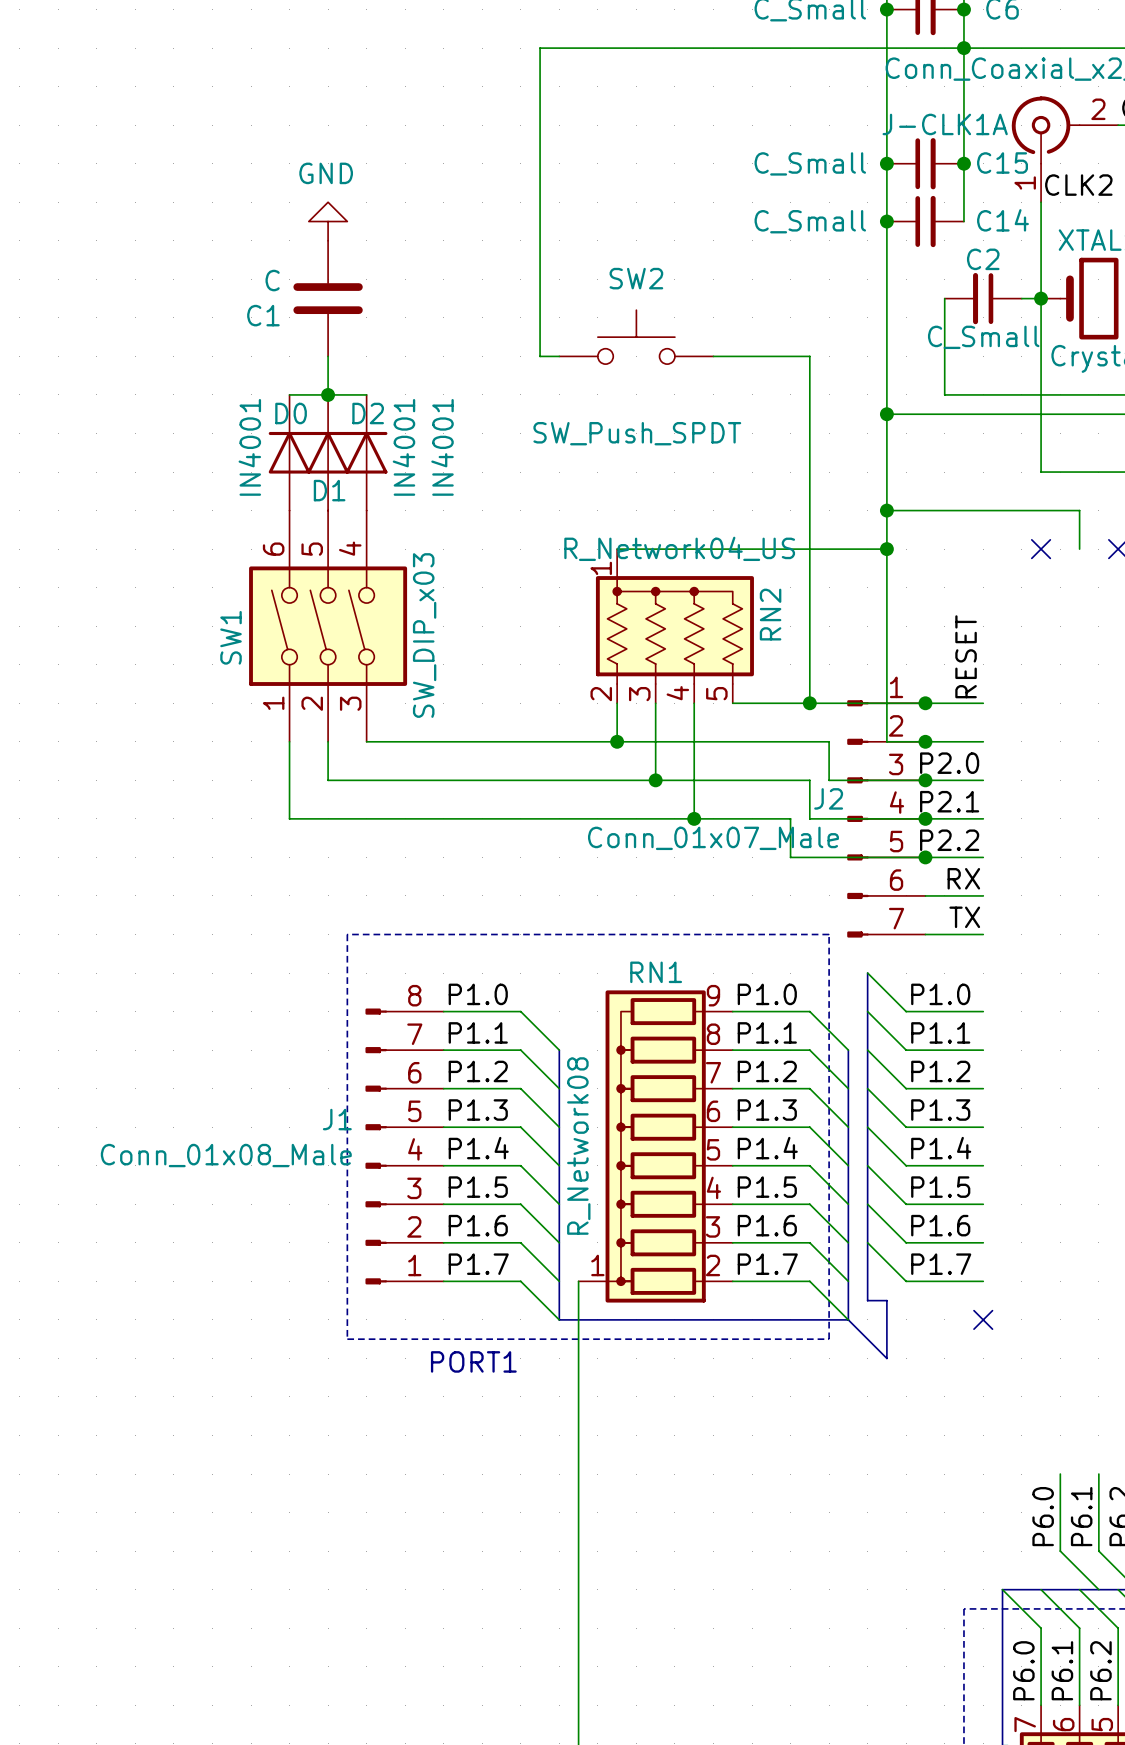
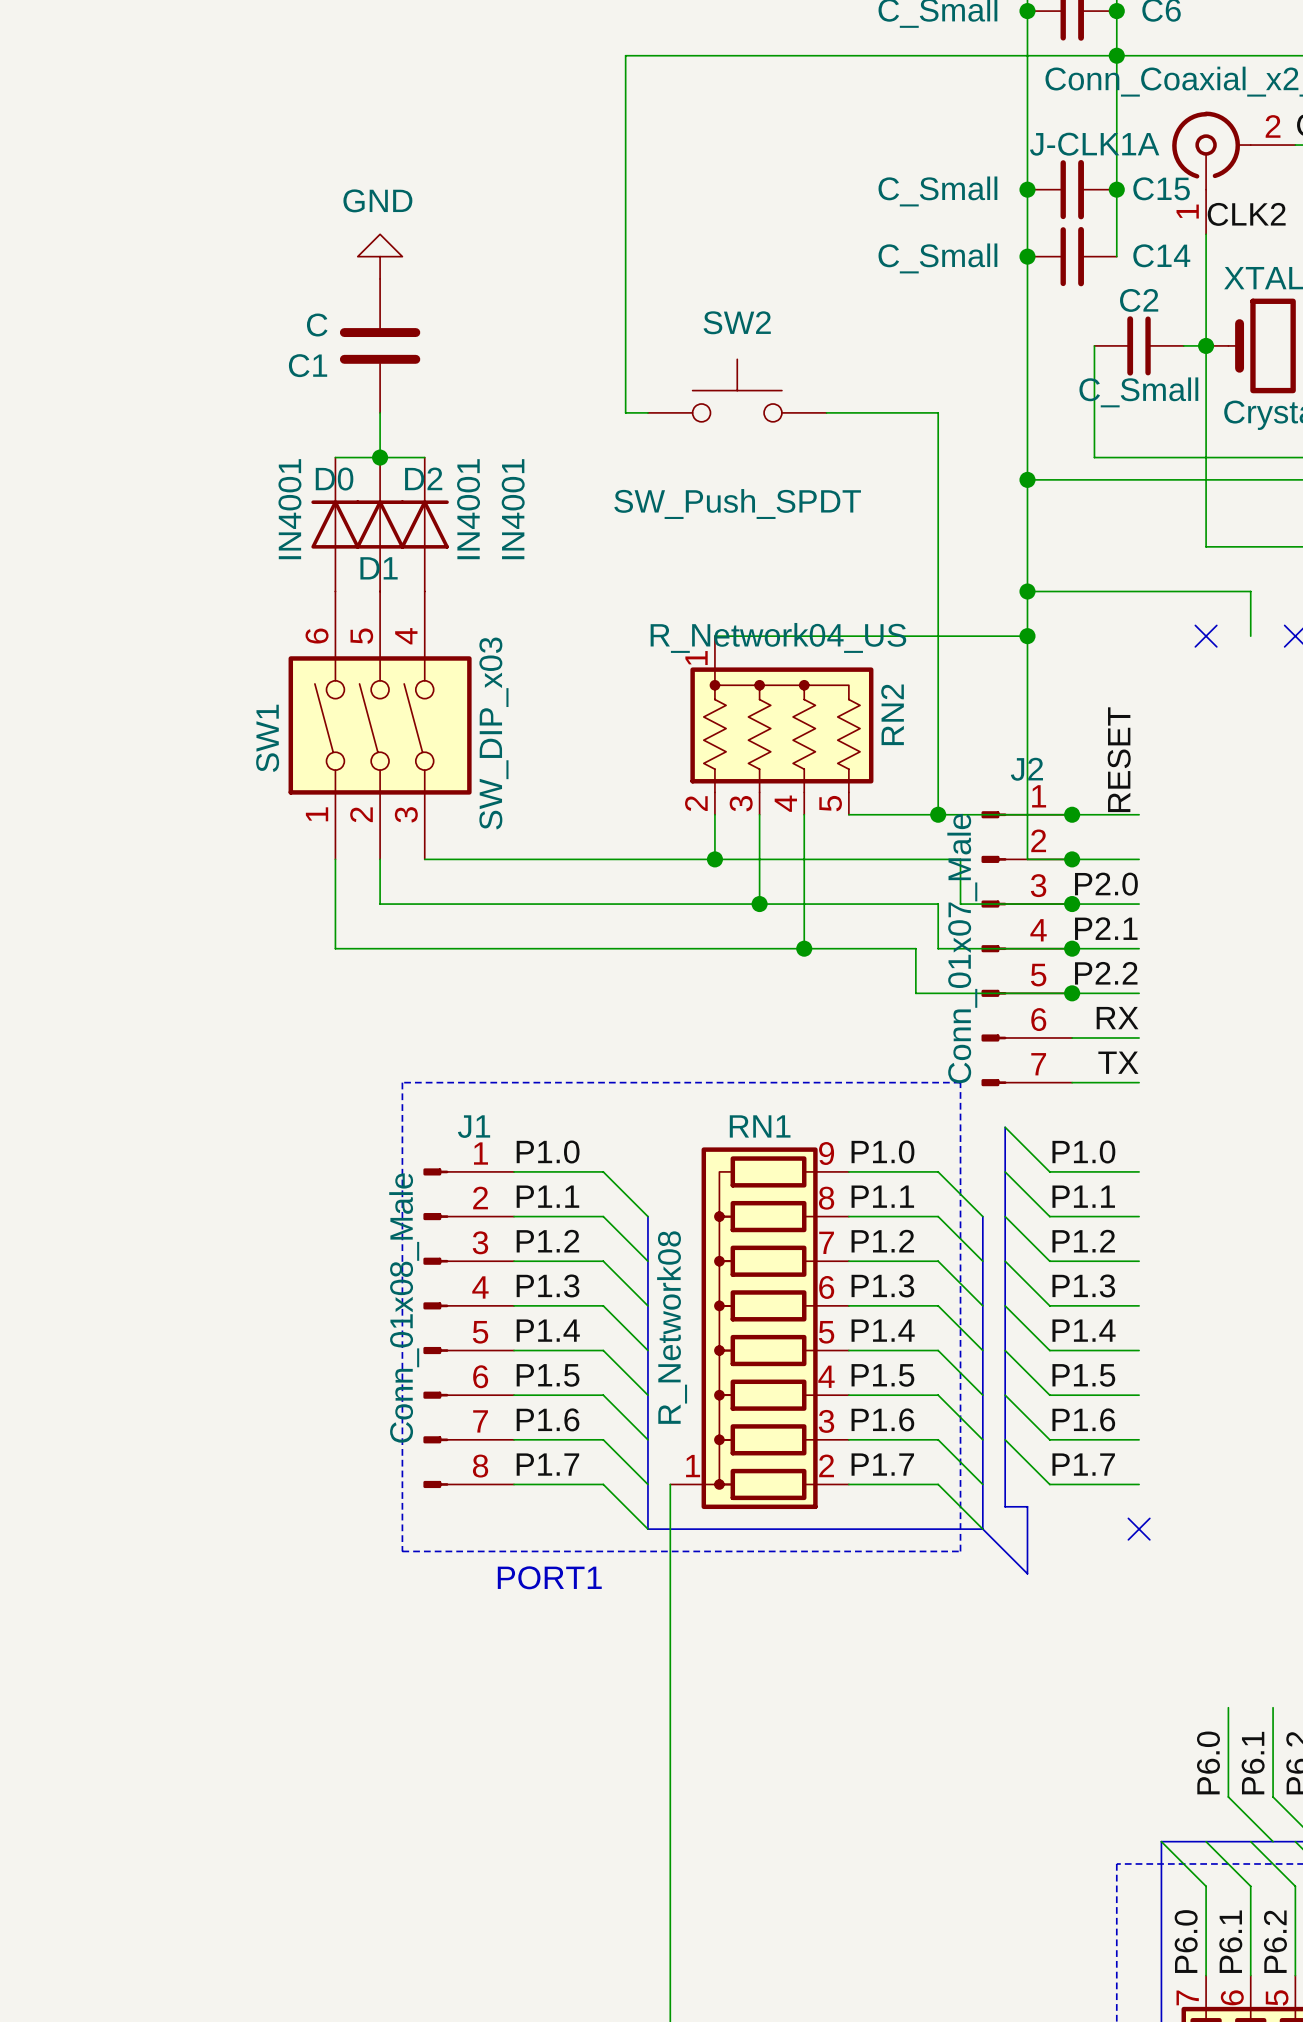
J2 name position: J2 (828, 798) -> J2 (1026, 769)
J2 value rotation: 0° (713, 838) -> 90° counterclockwise (962, 948)
J1 name position: J1 (337, 1119) -> J1 (474, 1126)
J1 flip: as is (376, 1146) -> up-down (435, 1328)
J1 value position: Conn_01x08_Male (226, 1155) -> Conn_01x08_Male (404, 1308)

